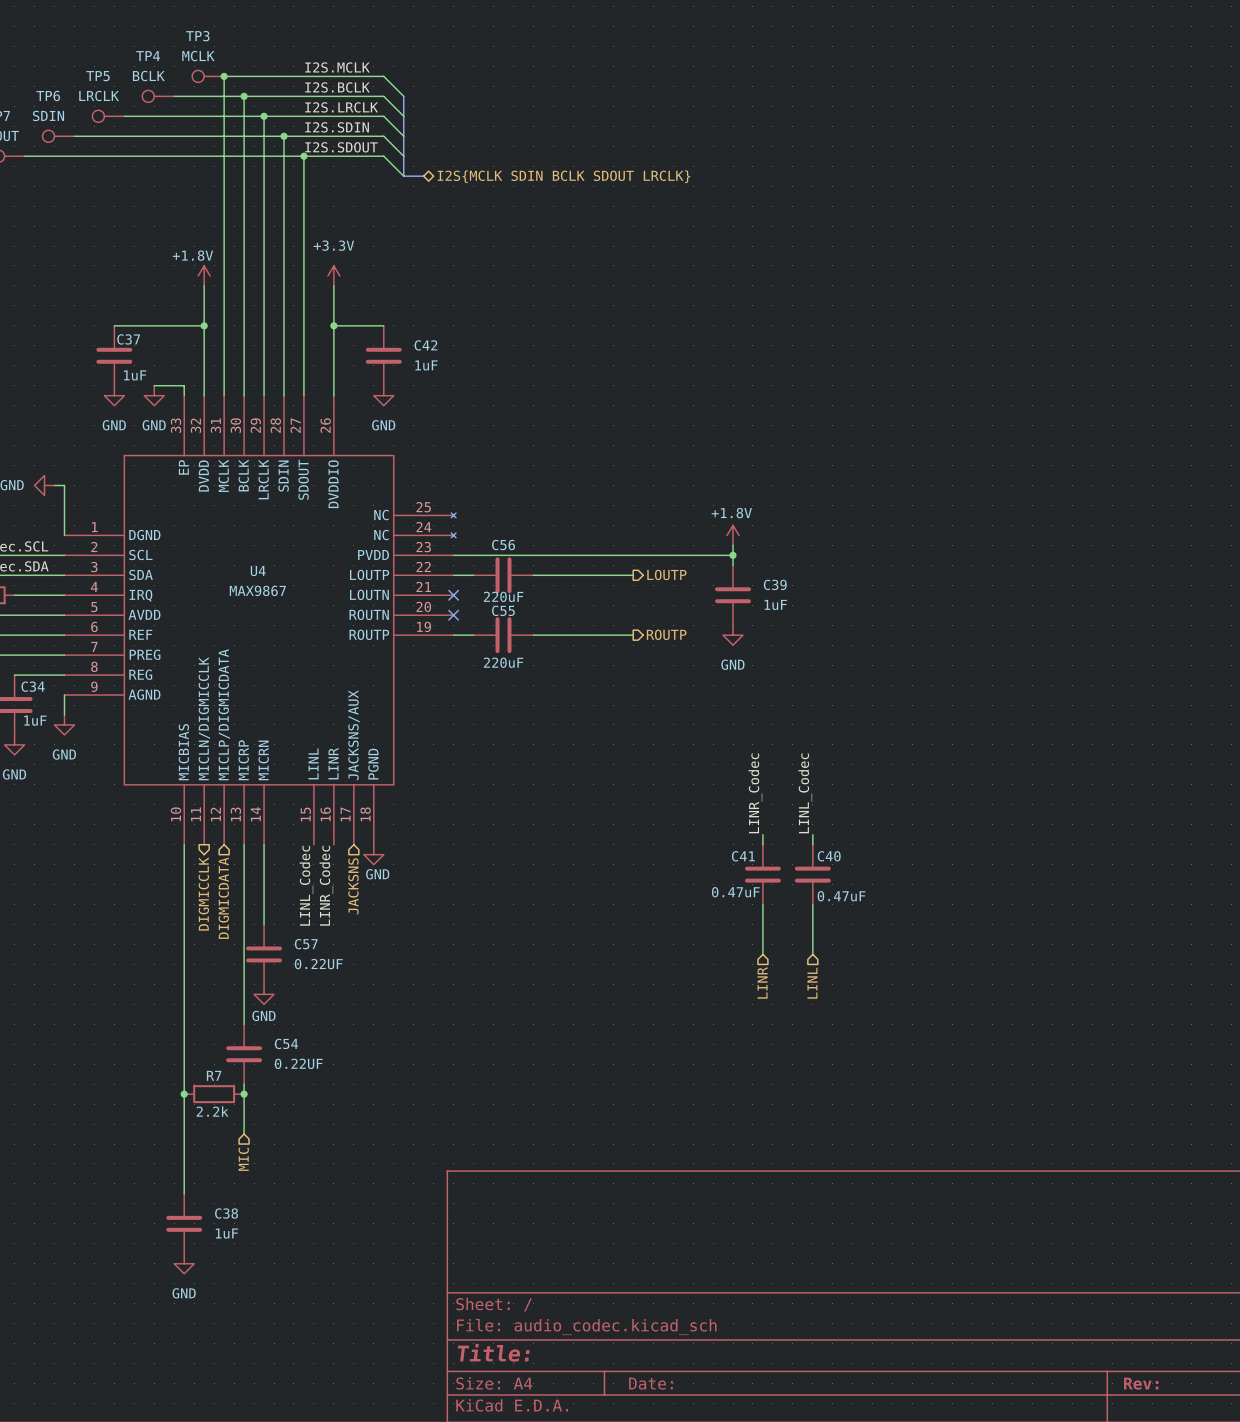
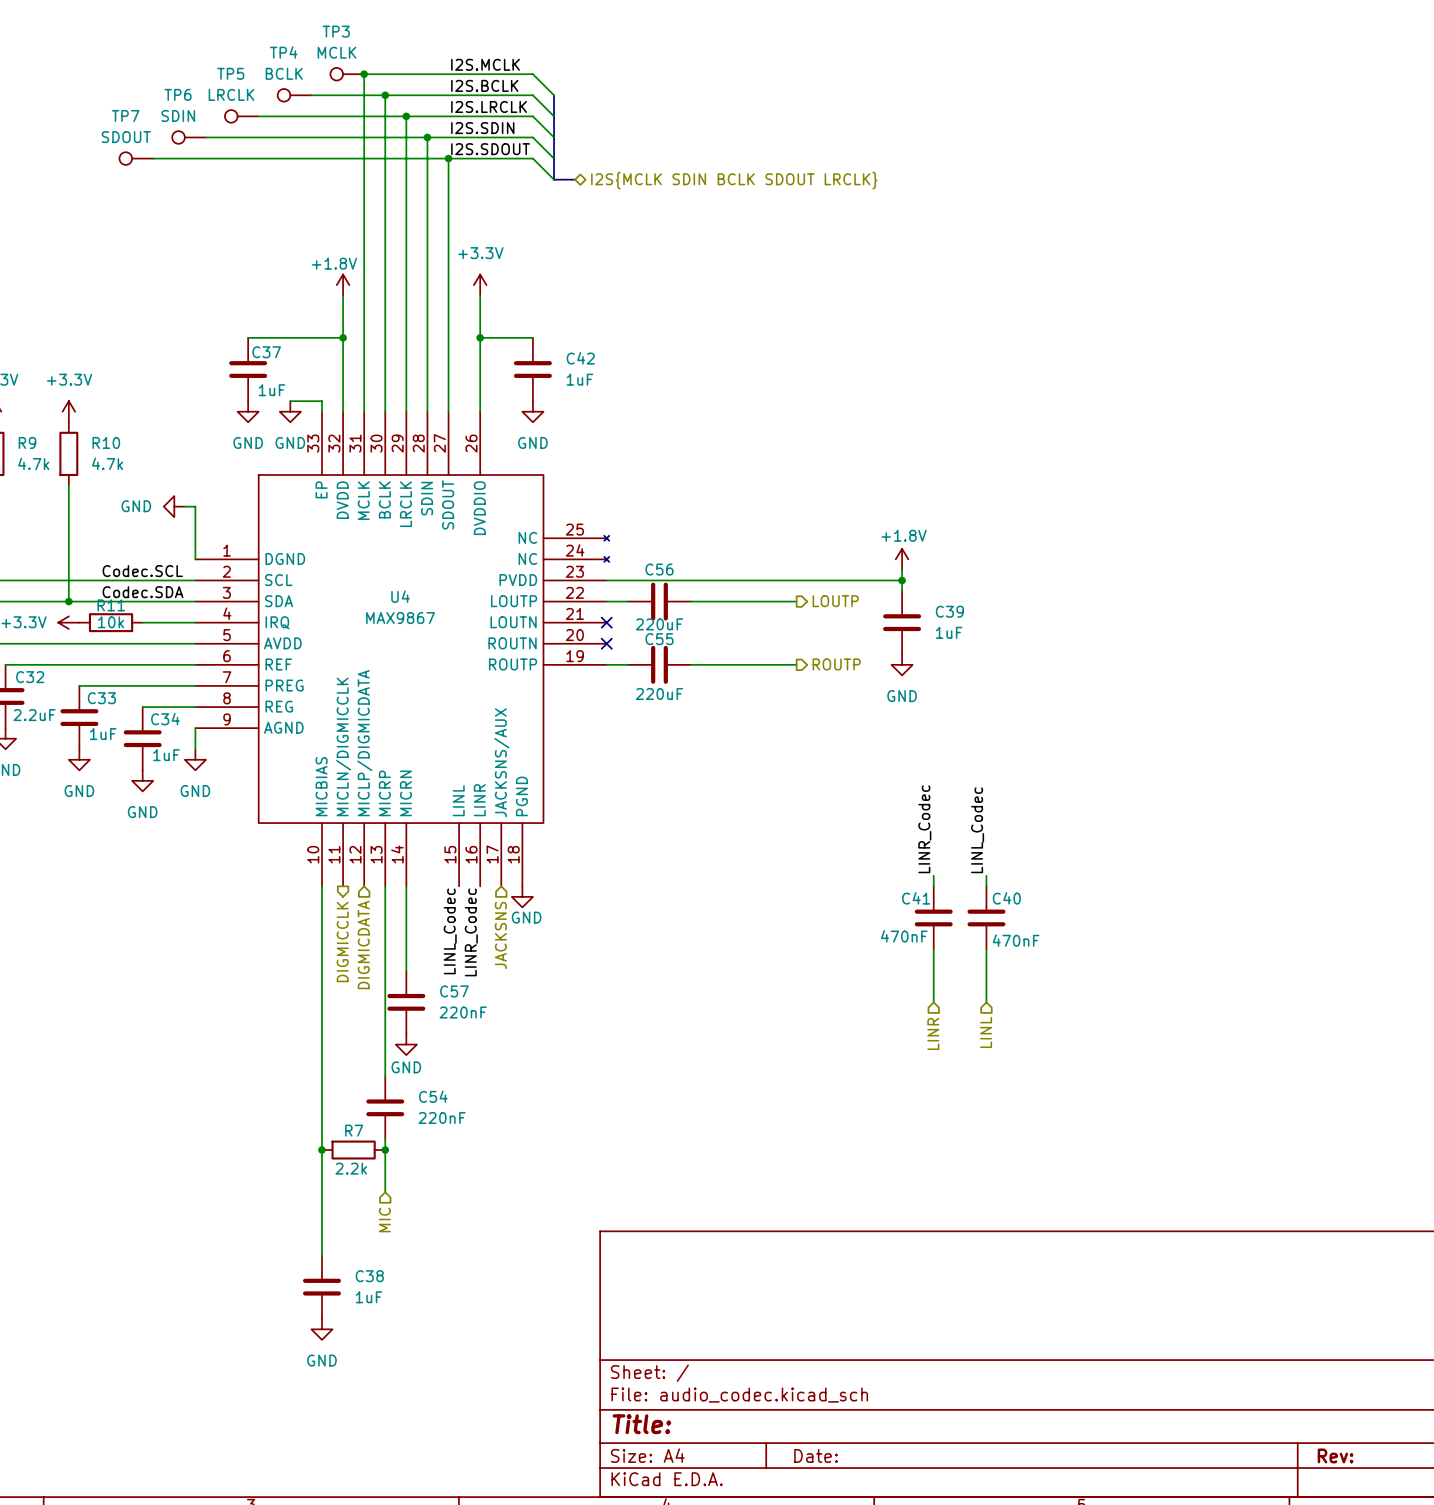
C41 value: 0.47uF (735, 892) -> 470nF (904, 936)
C40 value: 0.47uF (841, 896) -> 470nF (1016, 940)
C57 value: 0.22UF (318, 964) -> 220nF (463, 1012)
C54 value: 0.22UF (298, 1063) -> 220nF (442, 1117)

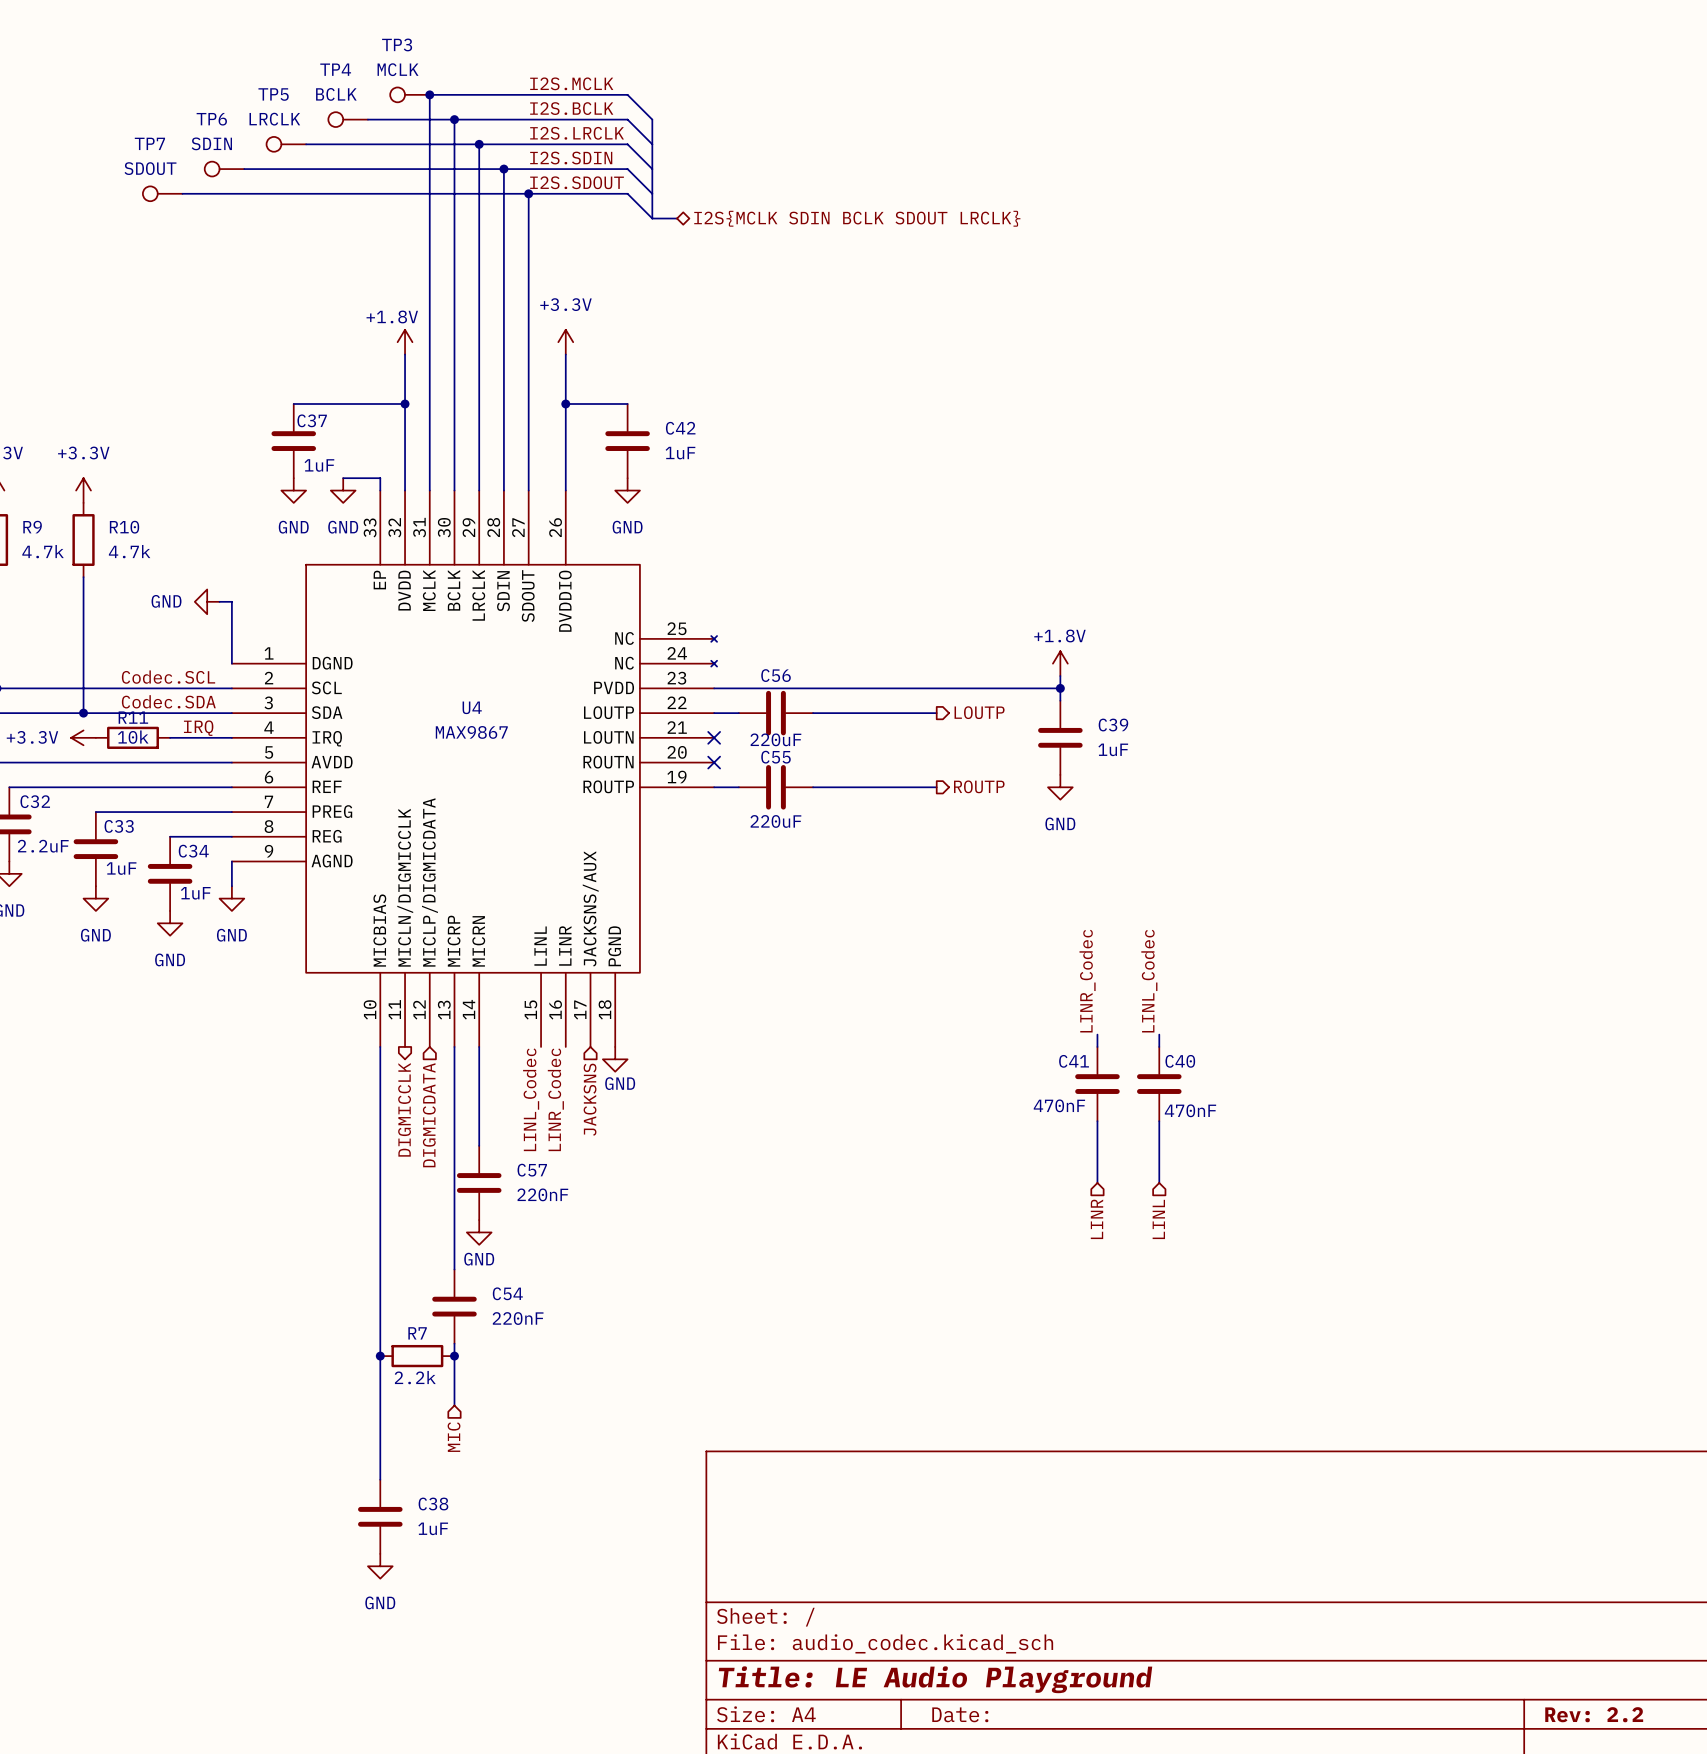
label: none -> IRQ (198, 728)
title block: Title: (641, 1424) -> Title: LE Audio Playground (935, 1679)
title block: Rev: (1335, 1455) -> Rev: 2.2 (1594, 1714)

